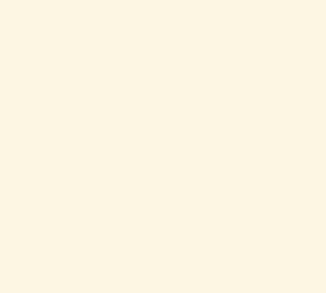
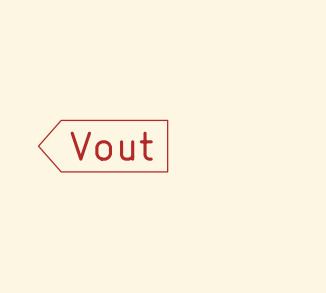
global label: none -> Vout (111, 146)

